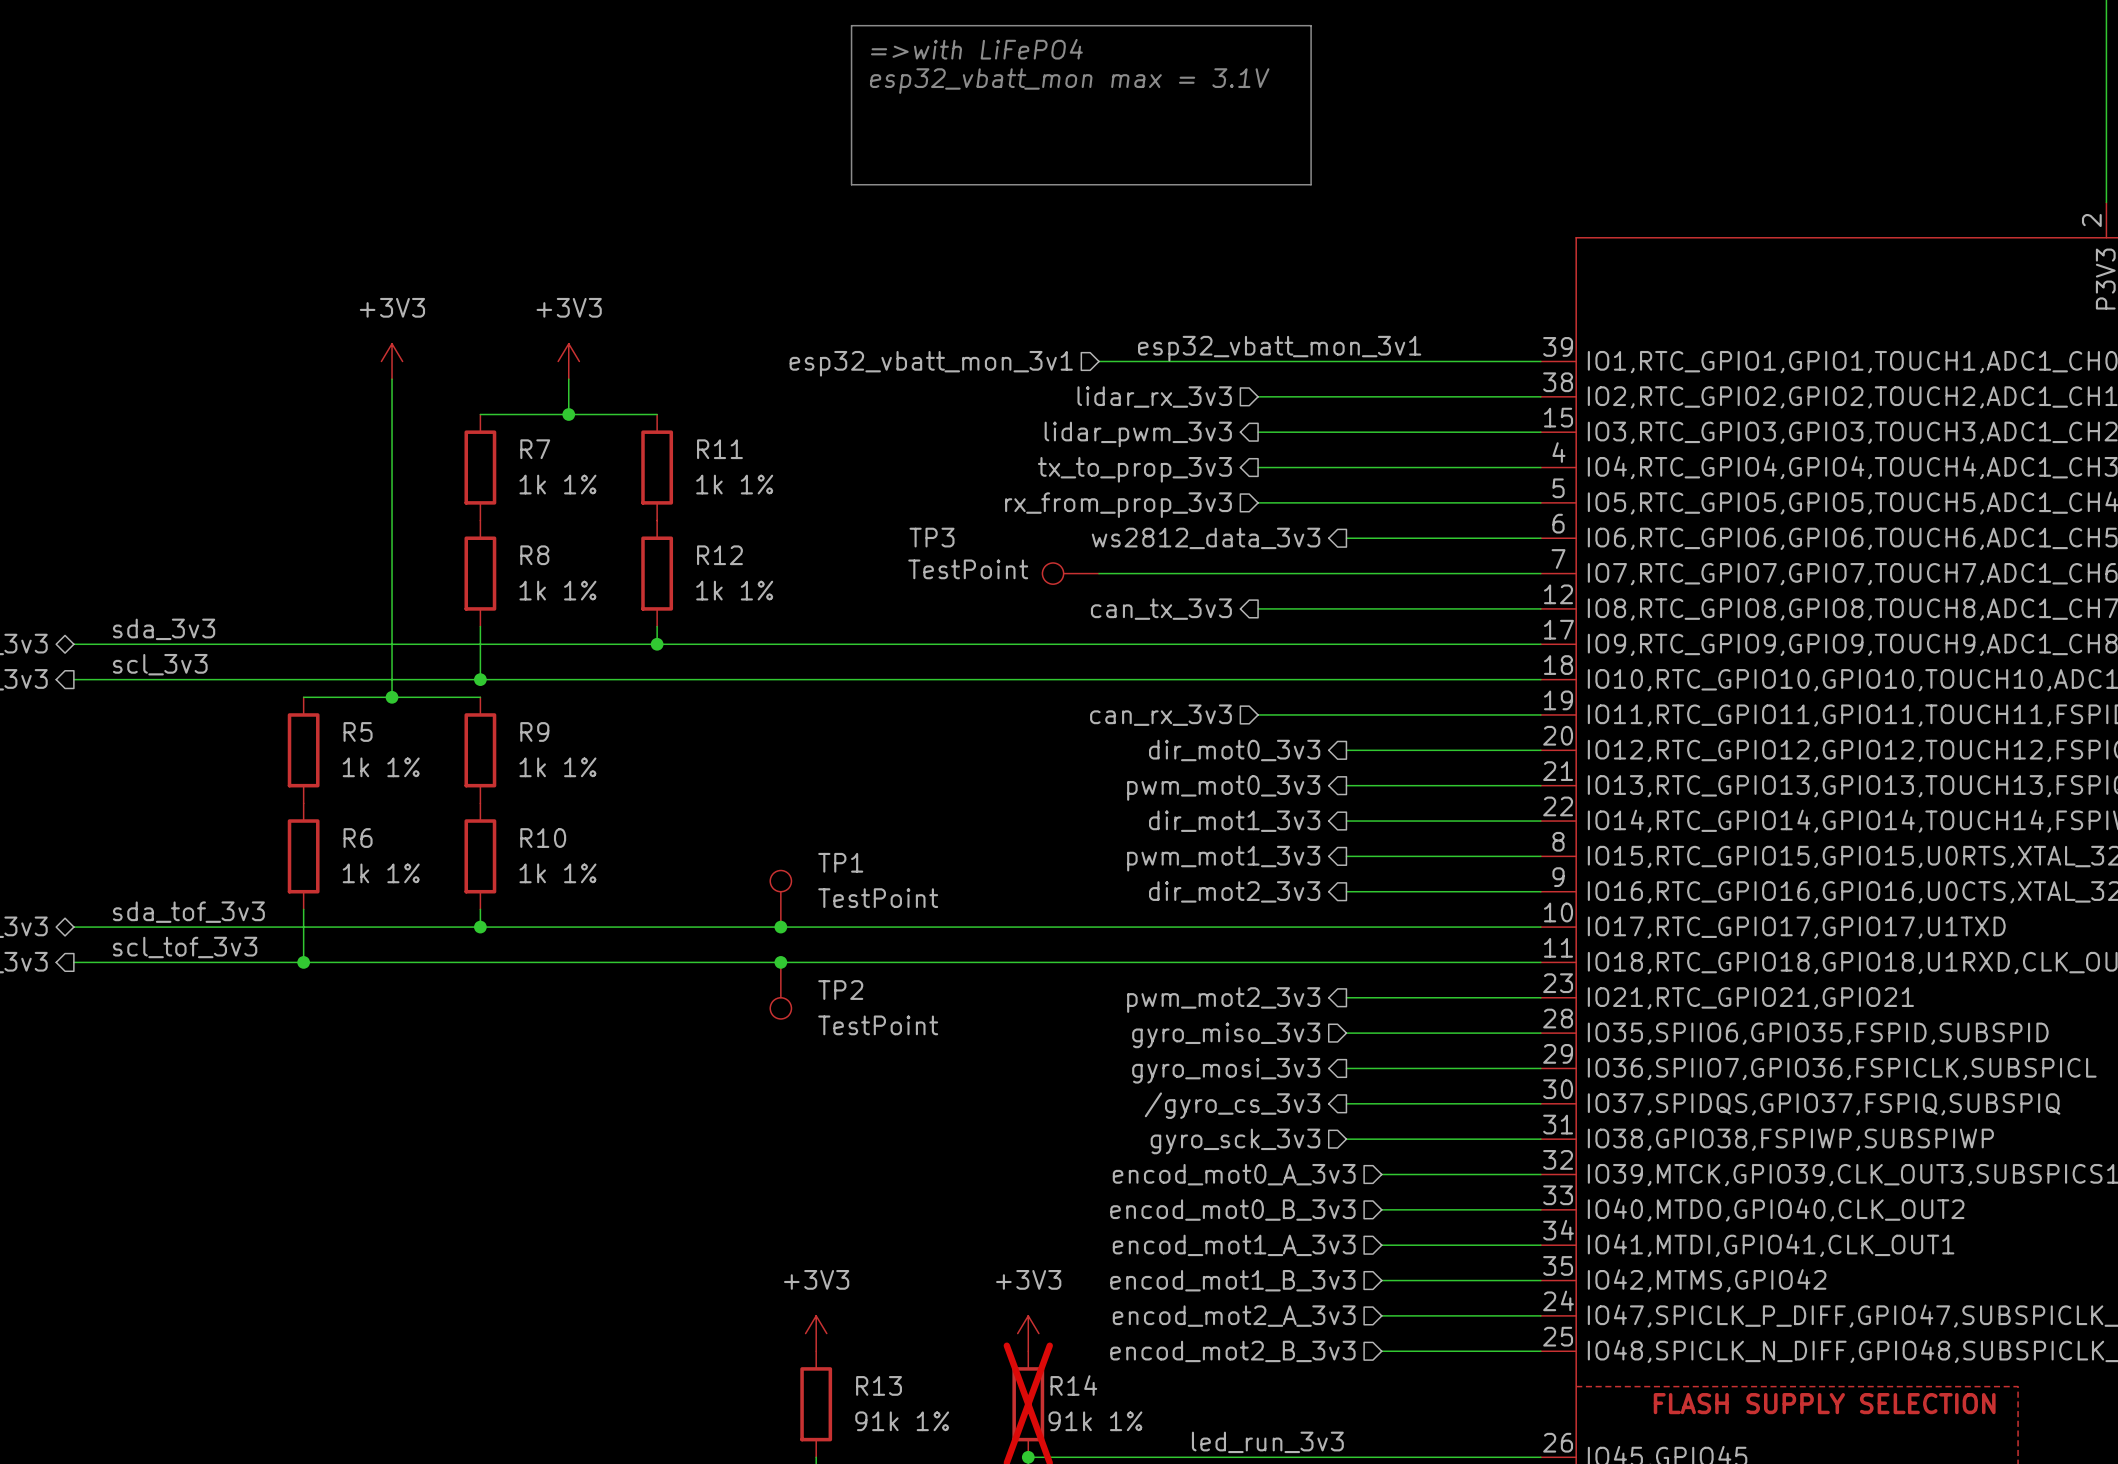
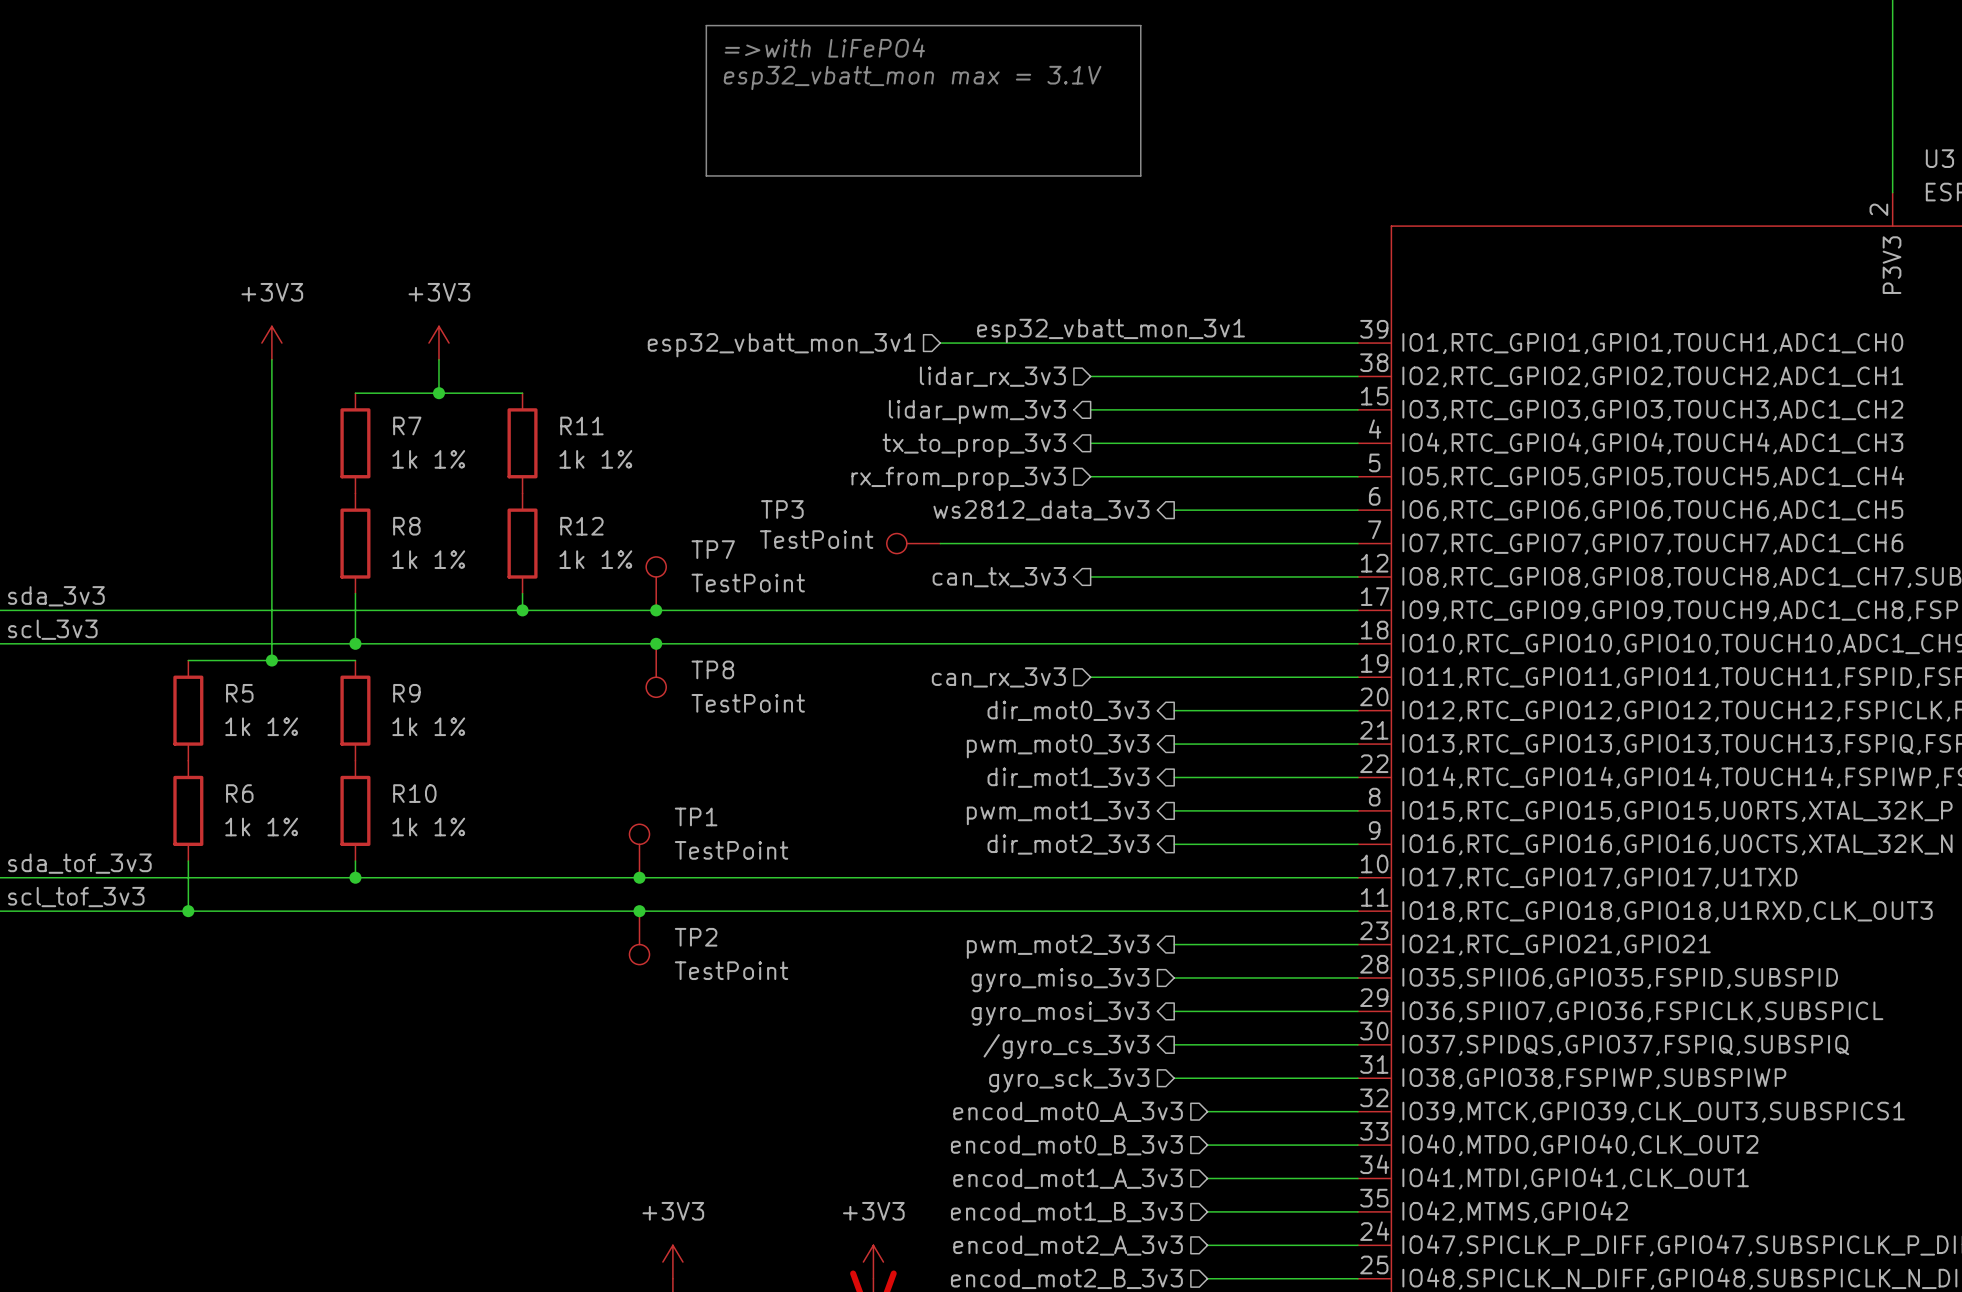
TP7: none -> TestPoint (656, 583)
junction: none -> (656, 610)
junction: none -> (656, 643)
TP8: none -> TestPoint (656, 670)

